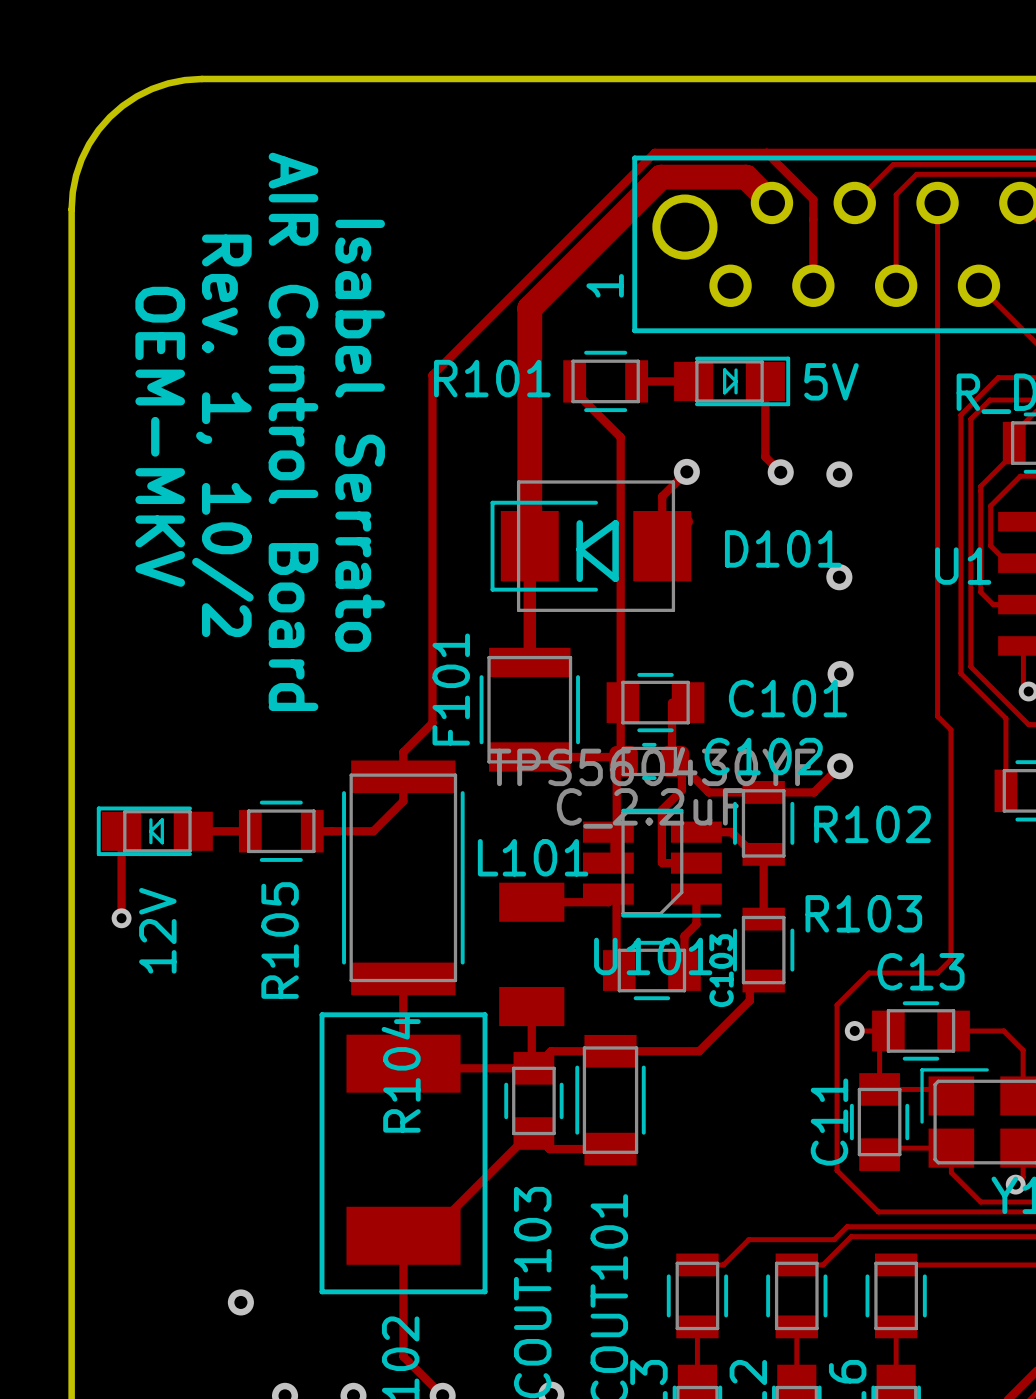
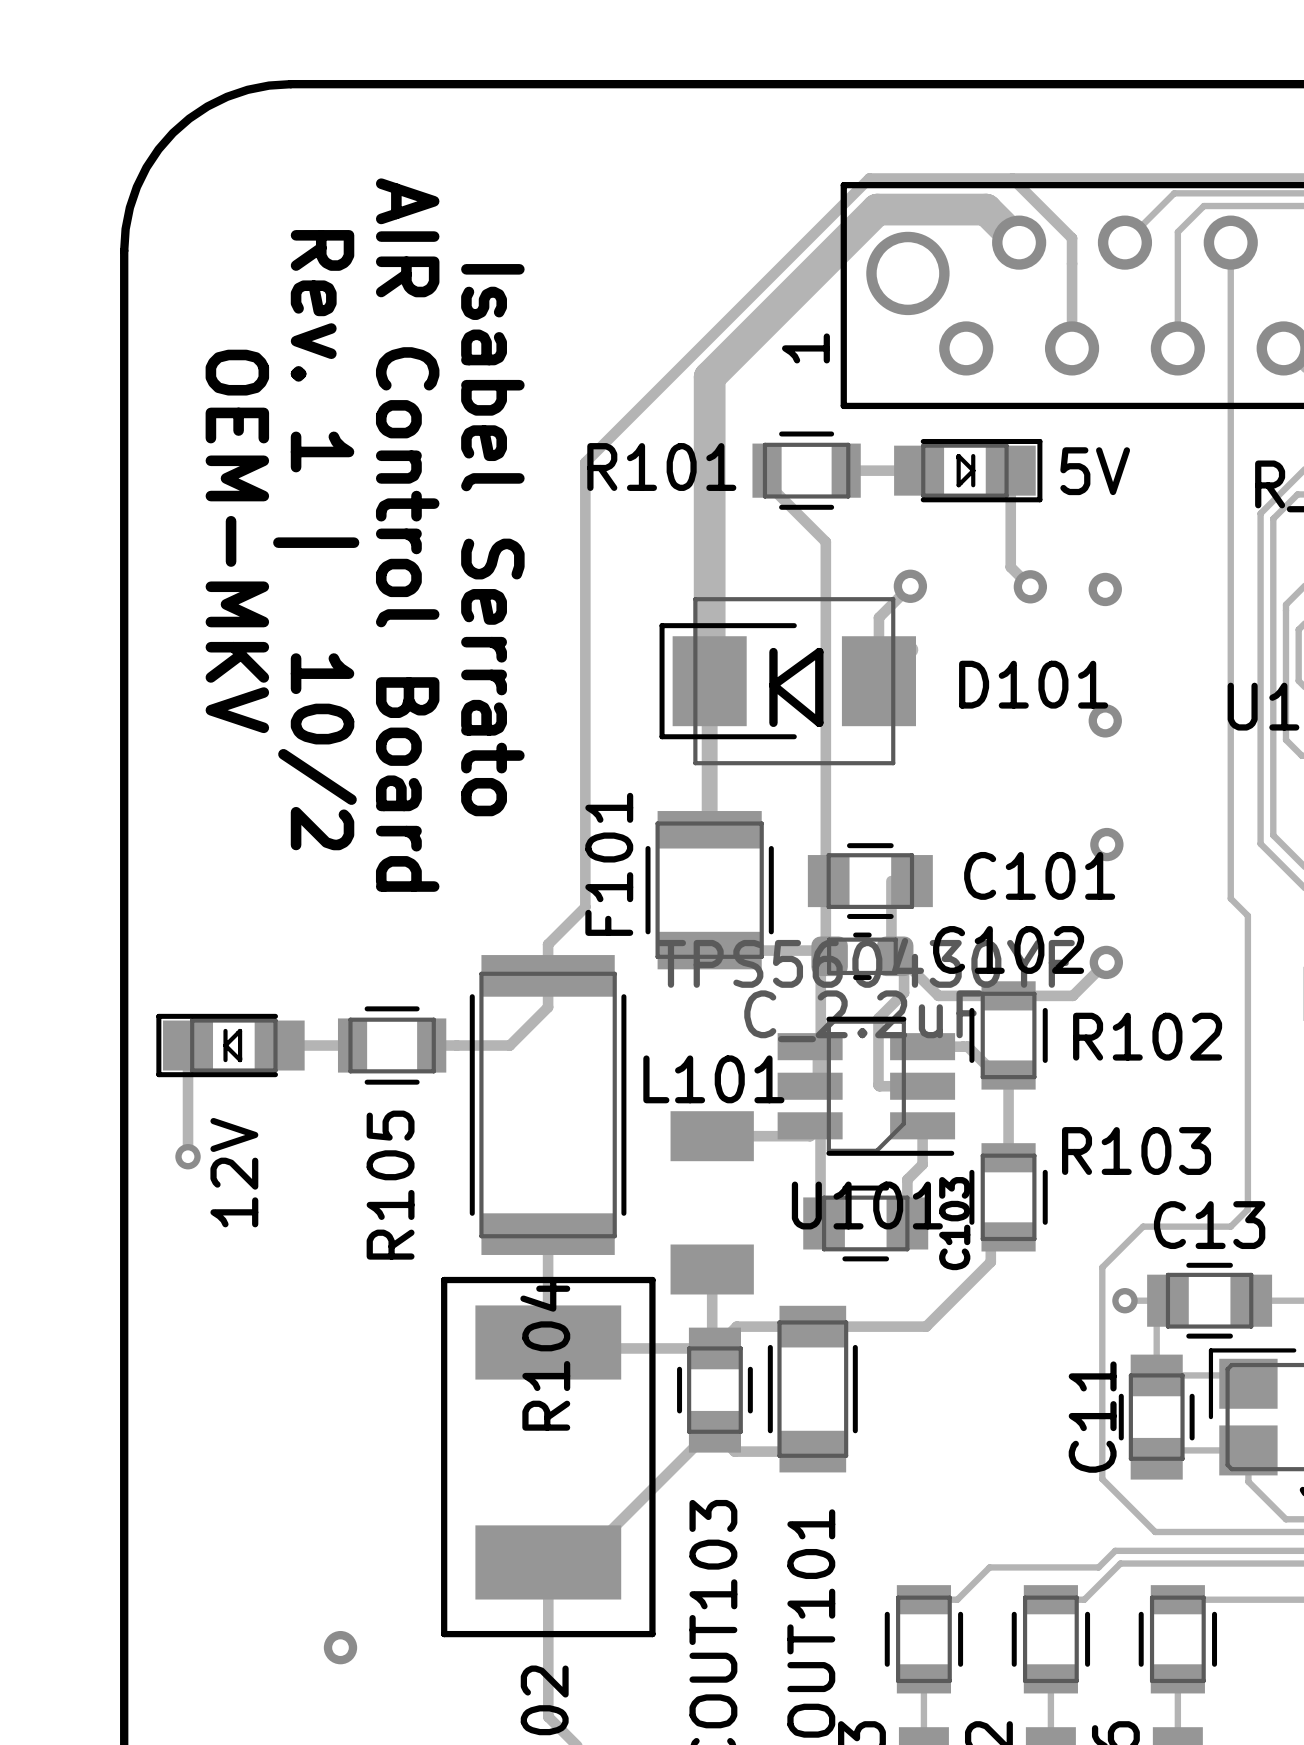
text: Rev. 1, 10/2 (222, 435) -> Rev. 1 | 10/2 (316, 540)

